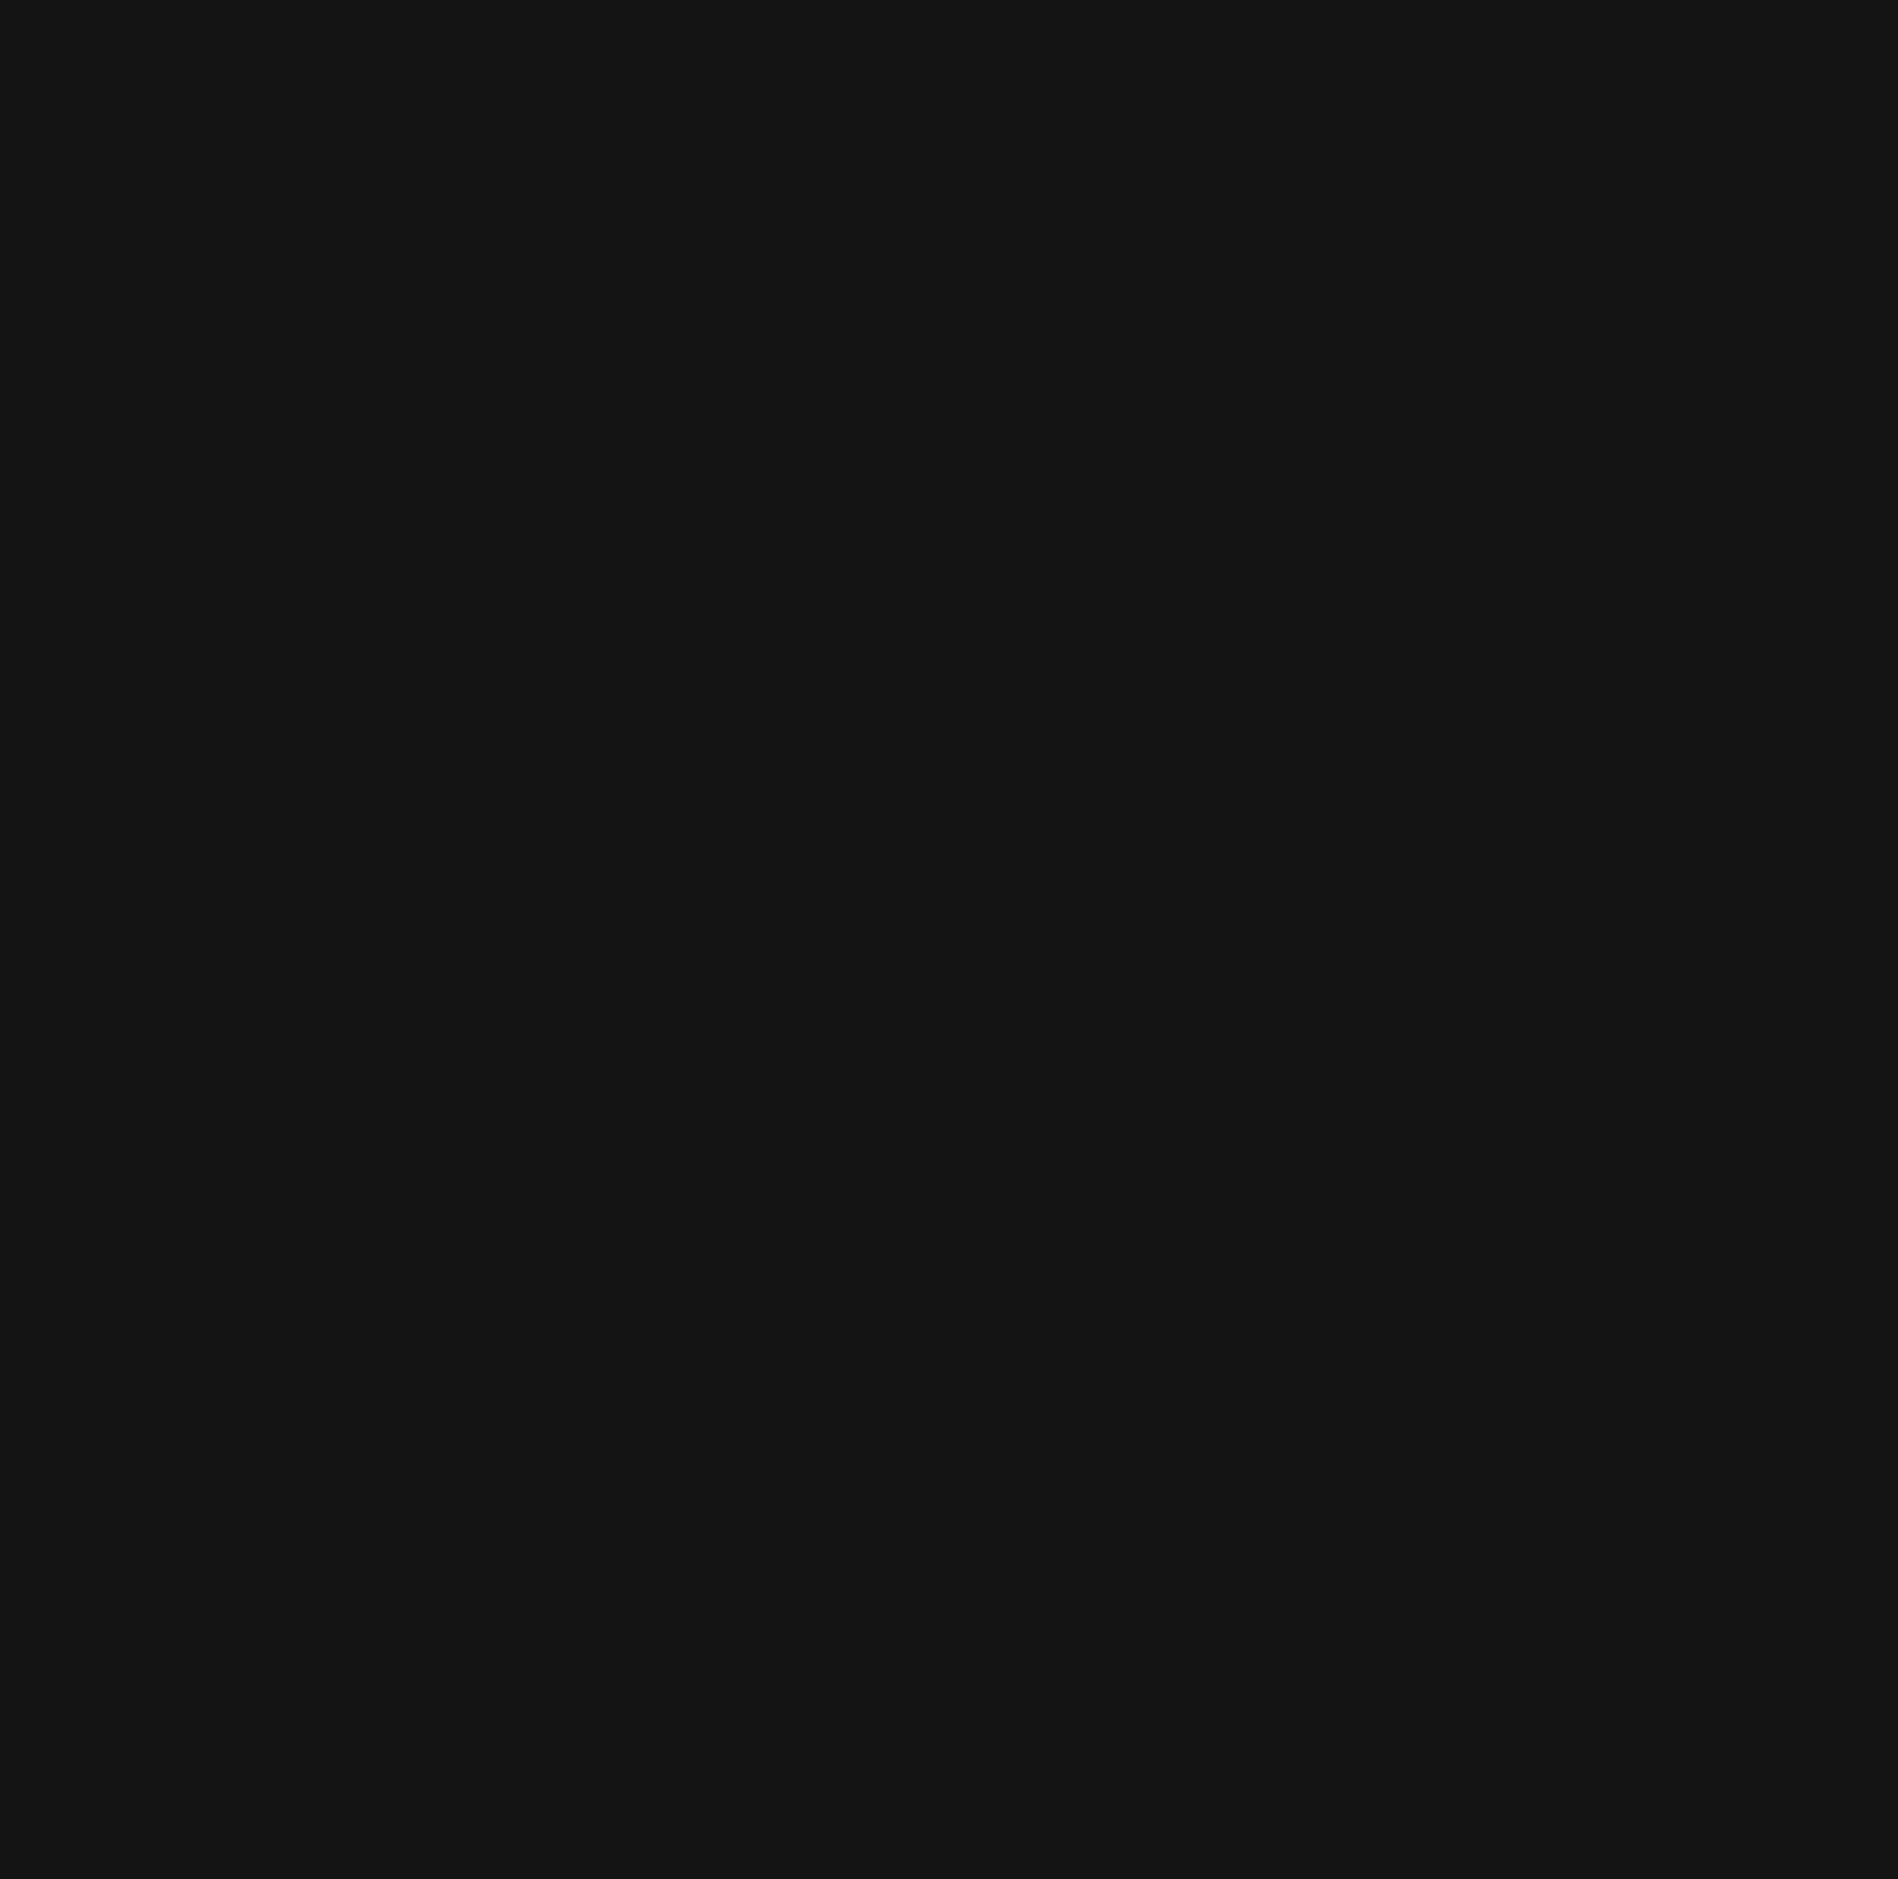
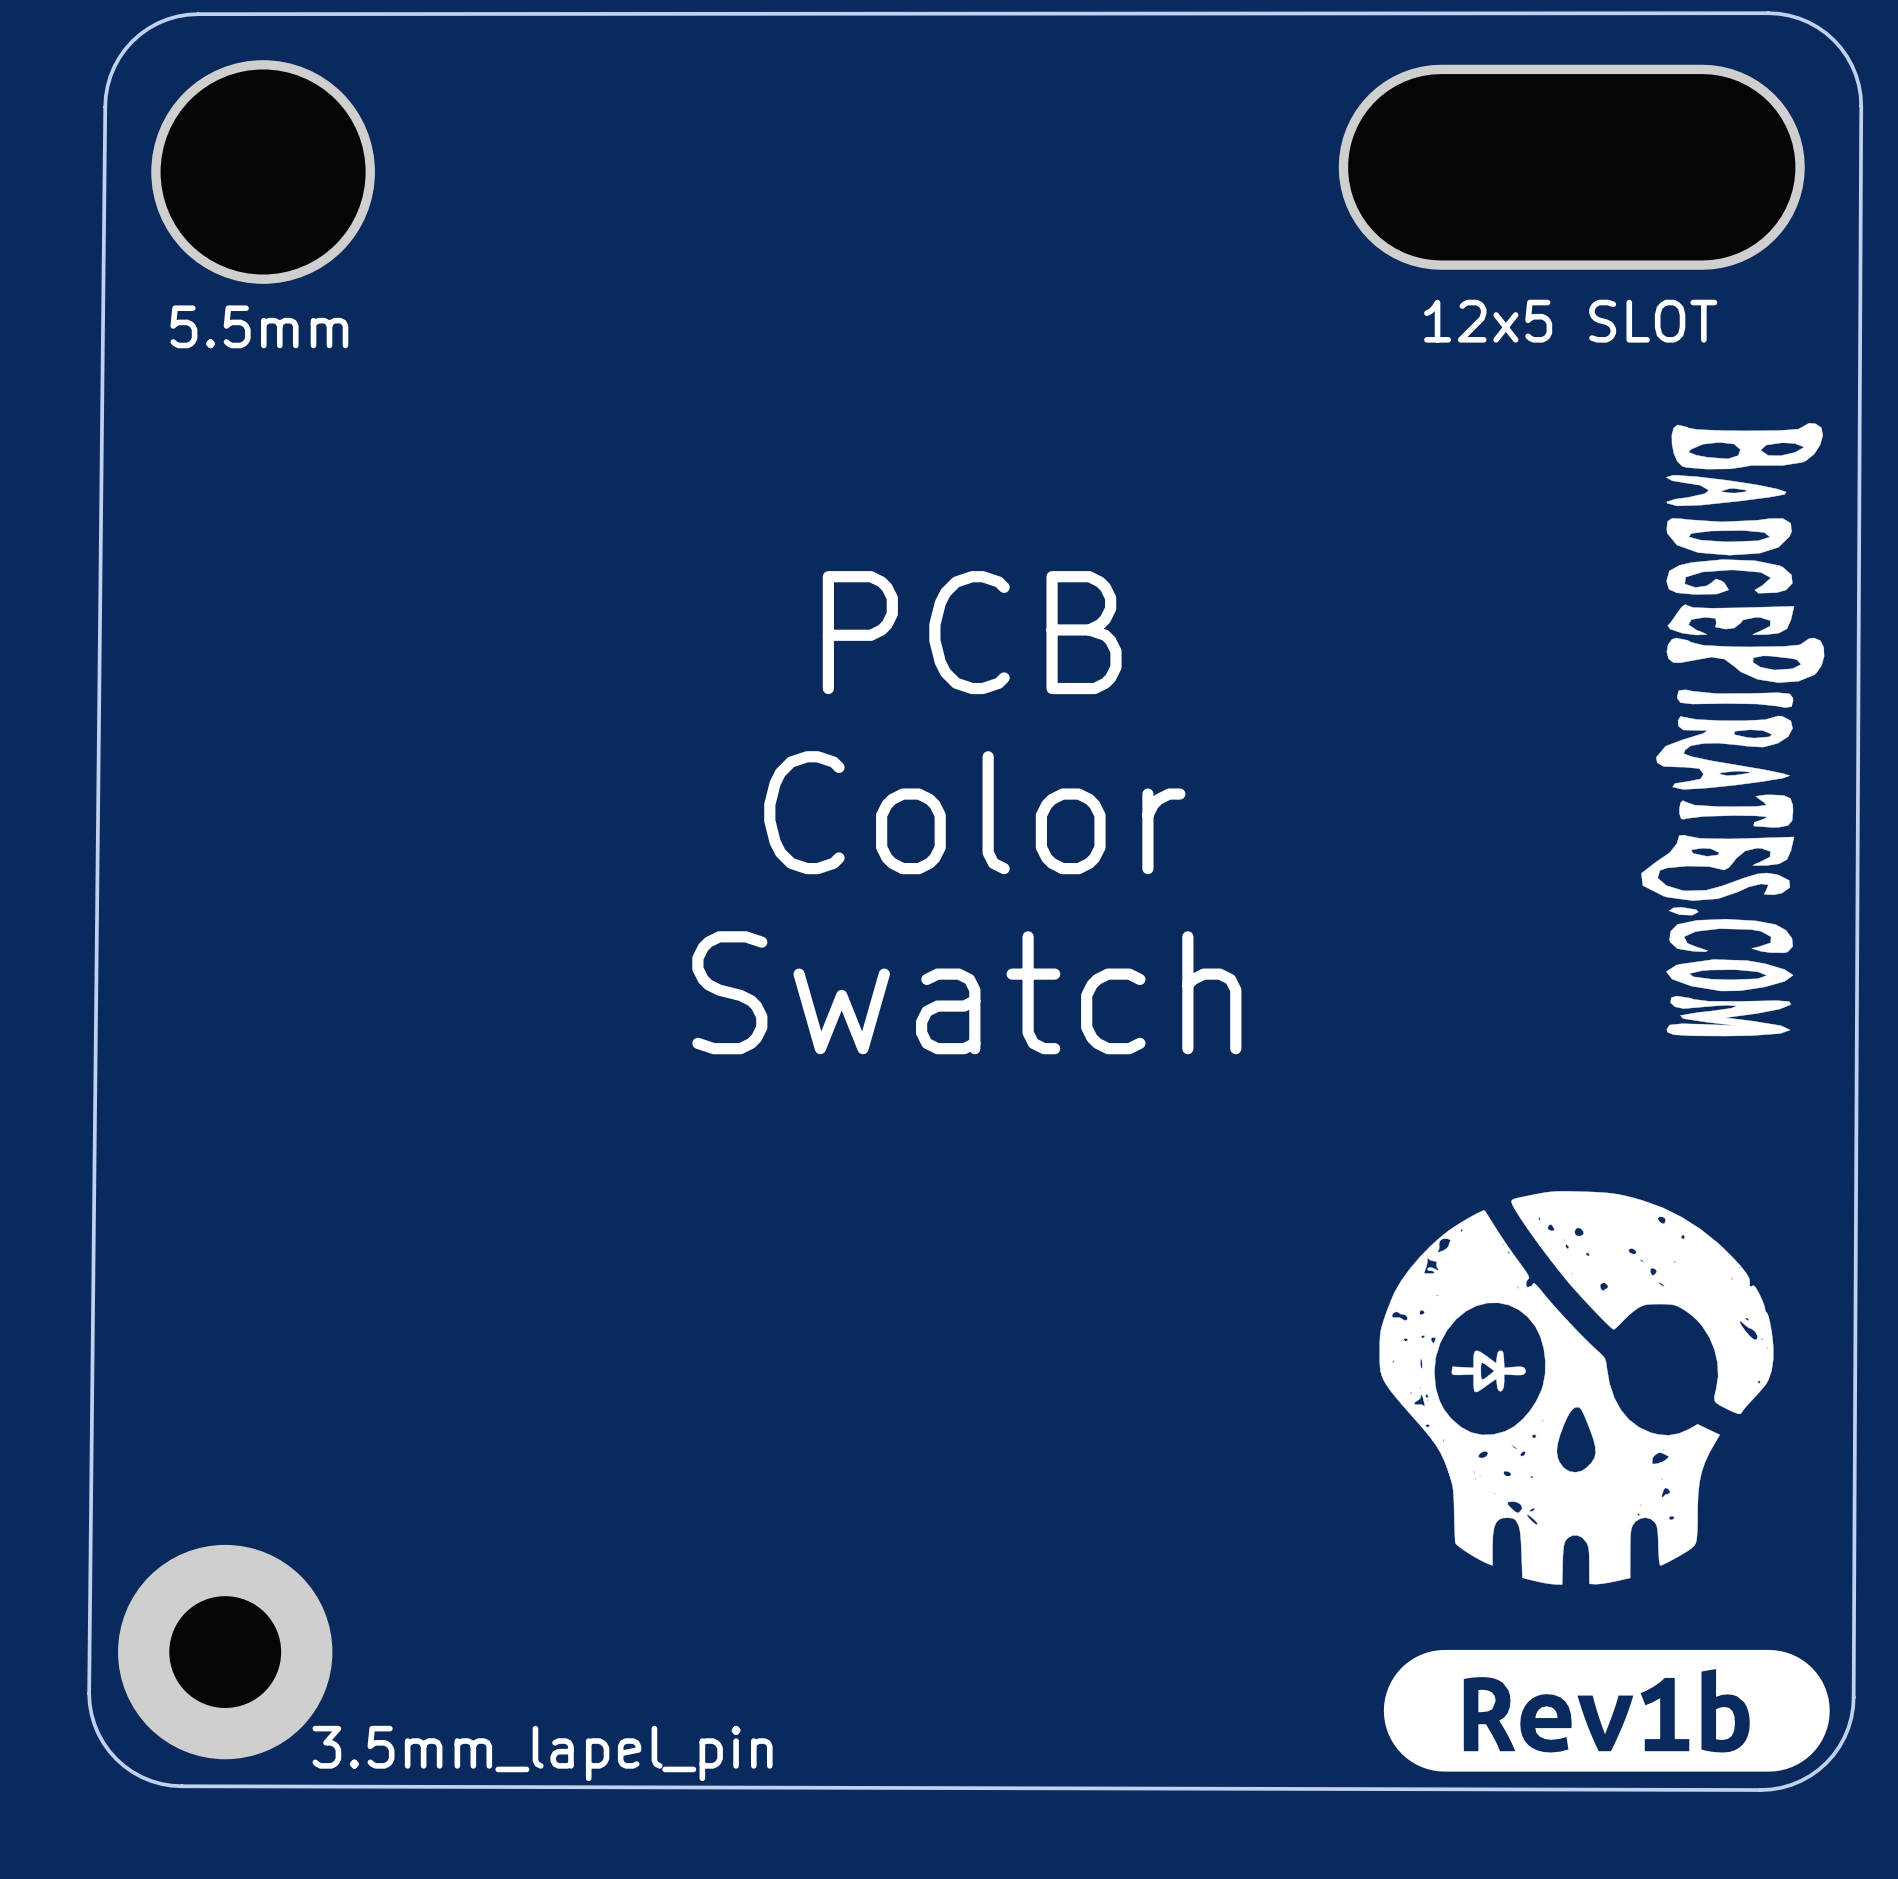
board edge: none -> (1768, 13) (198, 14) (177, 16) (157, 23) (132, 41) (119, 57) (110, 76) (105, 106) (89, 1693) (94, 1724) (103, 1742) (116, 1759) (141, 1777) (161, 1783) (181, 1786) (1760, 1790) (1791, 1784) (1810, 1775) (1826, 1762) (1844, 1737) (1851, 1717) (1853, 1697) (1861, 106) (1858, 85) (1852, 65) (1834, 40) (1808, 22) (1789, 15) (1768, 13)
part: none -> 12x5 SLOT (1571, 167)
part: none -> 5.5mm (263, 172)
drawing: none -> [1641, 423, 1825, 1037]
text: none -> PCB (972, 632)
text: none -> Color (974, 812)
text: none -> Swatch (966, 992)
drawing: none -> [1379, 1191, 1774, 1585]
drawing: none -> [1383, 1649, 1830, 1772]
part: none -> 3.5mm_lapel_pin (225, 1652)

